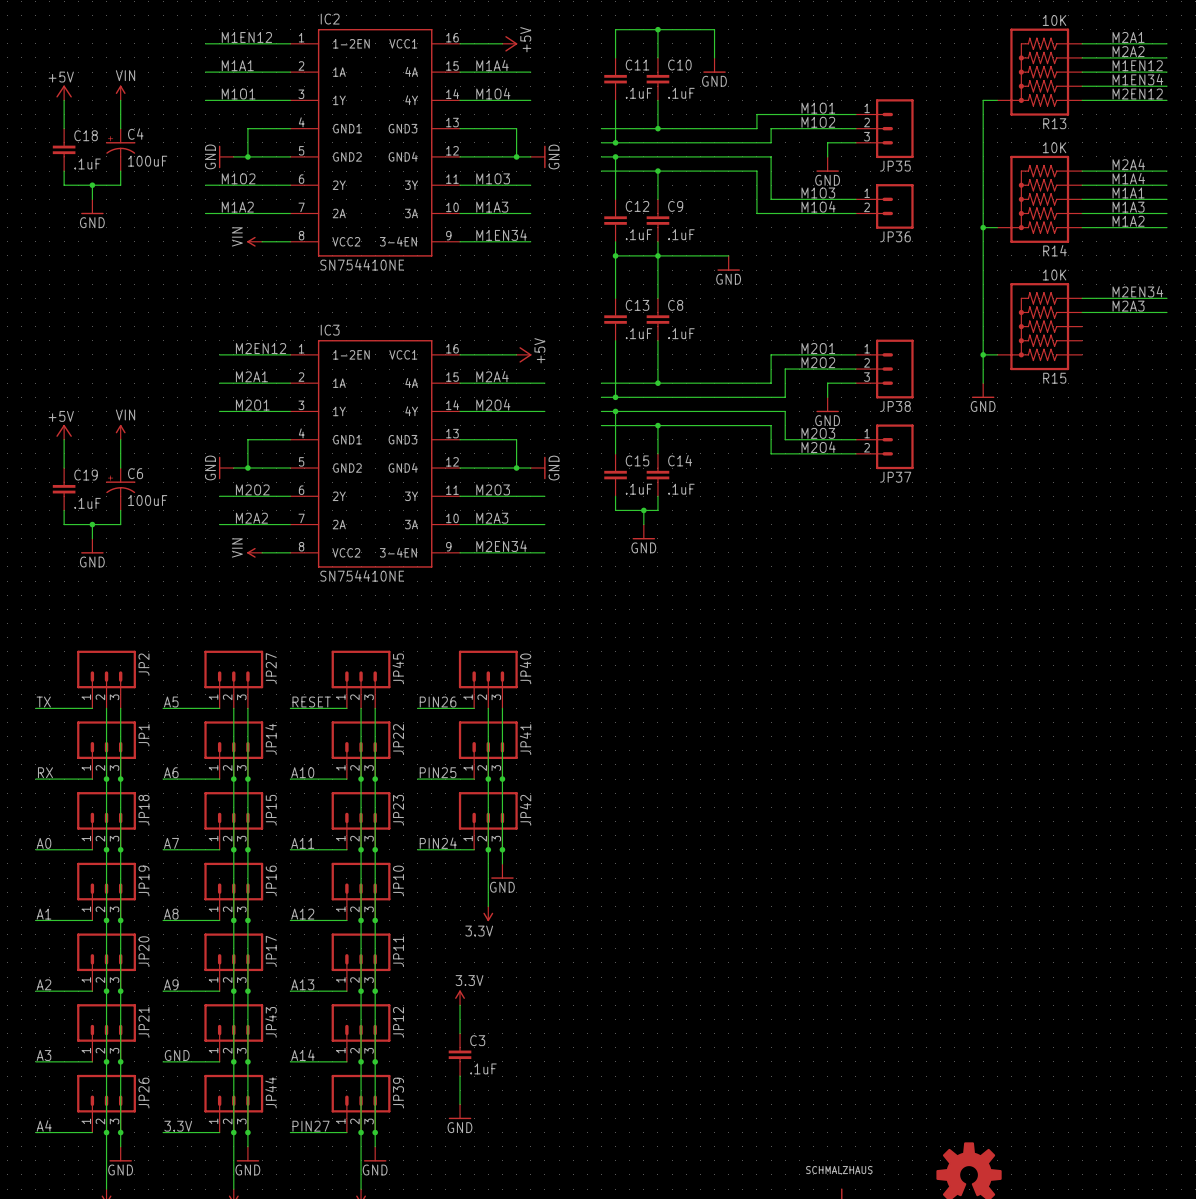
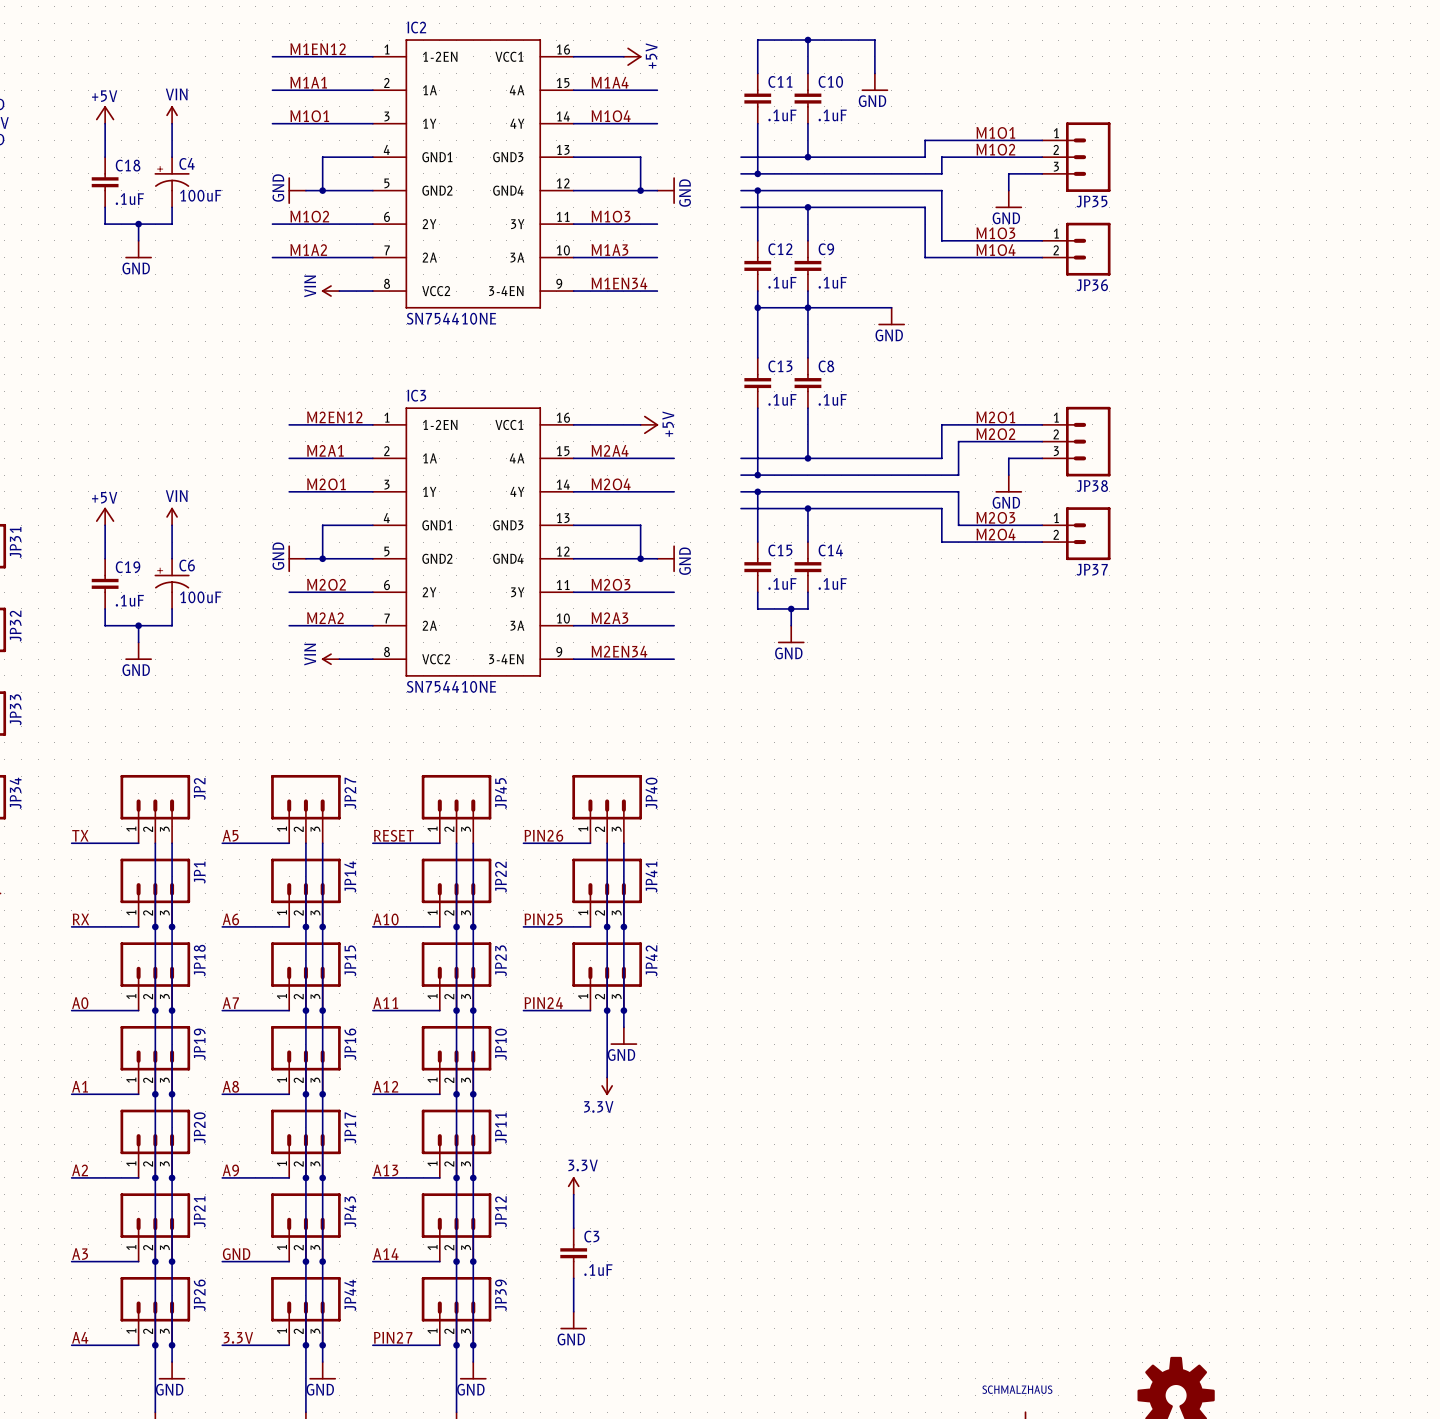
label: M2A1 (1128, 37) -> none
wire: (1082, 43) (1166, 43) -> none
label: M2A2 (1128, 51) -> none
wire: (1082, 57) (1166, 57) -> none
label: M1EN12 (1137, 65) -> none
R13: 10K (1039, 72) -> none
wire: (1082, 72) (1166, 72) -> none
label: M1EN34 (1137, 79) -> none
wire: (1082, 86) (1166, 86) -> none
label: M2EN12 (1137, 94) -> none
wire: (997, 100) (983, 100) (983, 383) -> none
wire: (1082, 100) (1166, 100) -> none
label: M2A4 (1128, 164) -> none
wire: (1082, 171) (1166, 171) -> none
label: M1A4 (1128, 178) -> none
wire: (1082, 185) (1166, 185) -> none
label: M1A1 (1128, 192) -> none
R14: 10K (1039, 199) -> none
wire: (1082, 199) (1166, 199) -> none
label: M1A3 (1128, 207) -> none
wire: (1082, 213) (1166, 213) -> none
label: M1A2 (1128, 221) -> none
wire: (983, 227) (997, 227) -> none
junction: (983, 227) -> none
wire: (1082, 227) (1166, 227) -> none
label: M2EN34 (1137, 291) -> none
wire: (1082, 298) (1166, 298) -> none
label: M2A3 (1128, 306) -> none
wire: (1082, 312) (1166, 312) -> none
R15: 10K (1039, 326) -> none
wire: (983, 354) (997, 354) -> none
junction: (983, 354) -> none
power symbol: GND (983, 390) -> none

